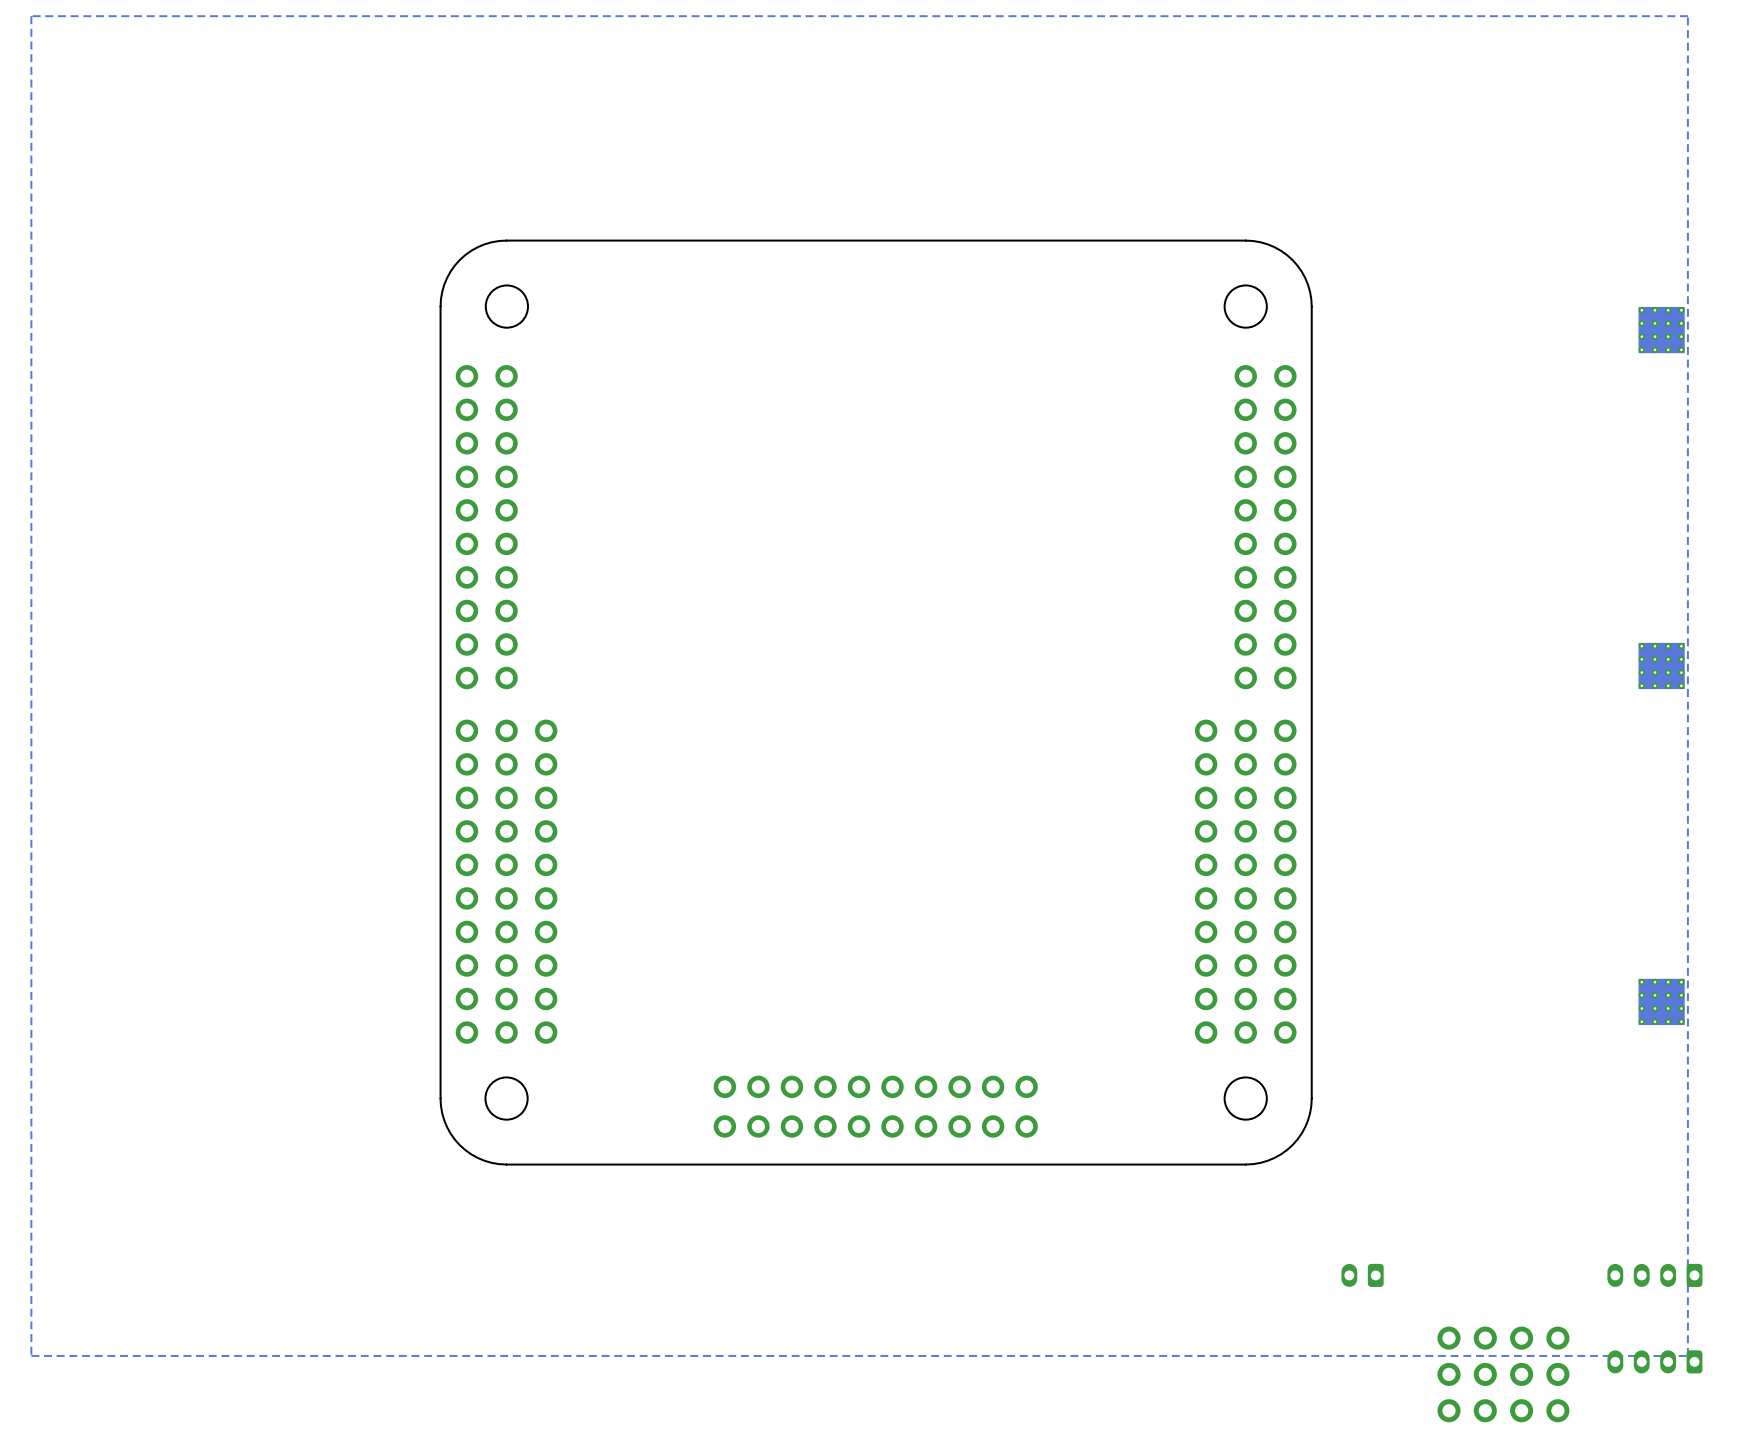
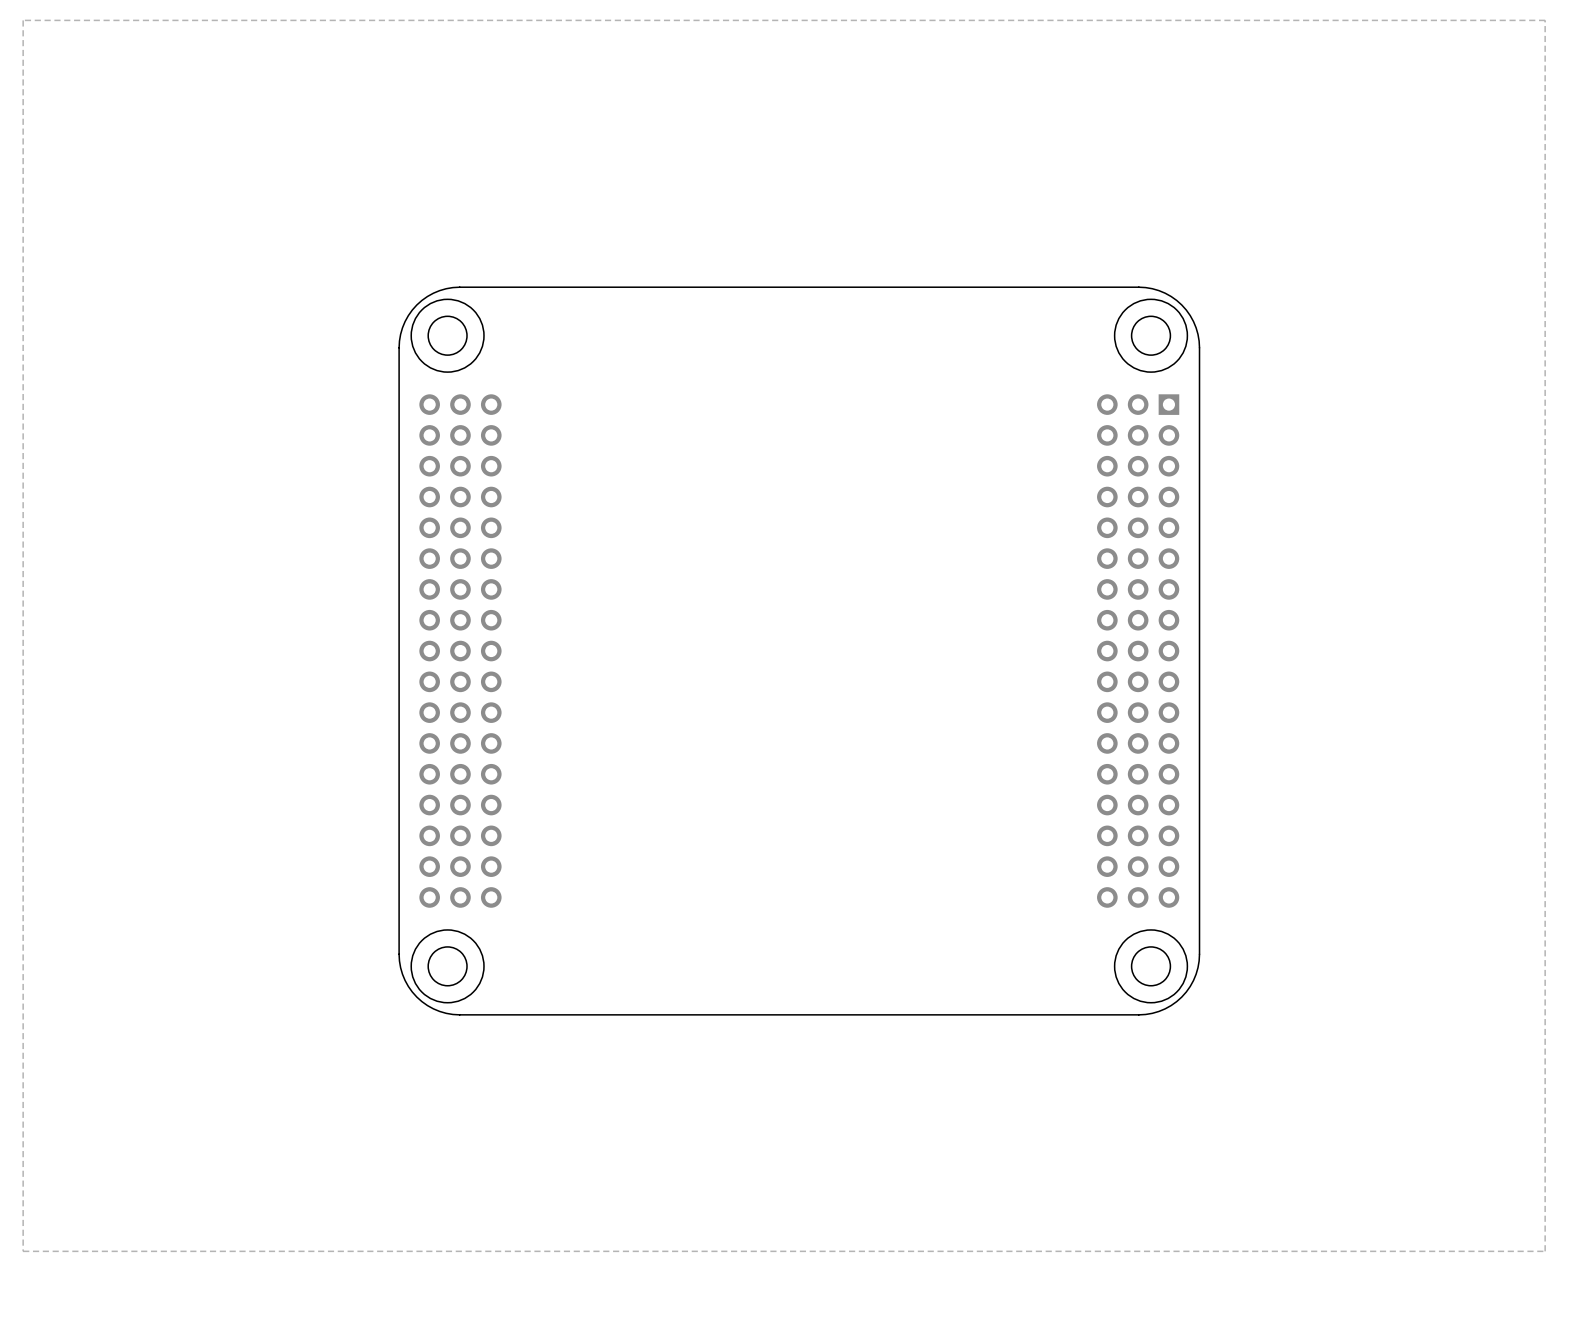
part footprint: [440, 240, 1313, 1165] -> [398, 286, 1200, 1016]
part: (1661, 330) -> none
part: (1661, 666) -> none
part: (1661, 1001) -> none
part: (1362, 1275) -> none
part: (1654, 1275) -> none
part: (1449, 1338) -> none
part: (1485, 1338) -> none
part: (1521, 1338) -> none
part: (1557, 1338) -> none
part: (1654, 1361) -> none
part: (1449, 1374) -> none
part: (1485, 1374) -> none
part: (1521, 1374) -> none
part: (1557, 1374) -> none
part: (1449, 1410) -> none
part: (1485, 1410) -> none
part: (1521, 1410) -> none
part: (1557, 1410) -> none

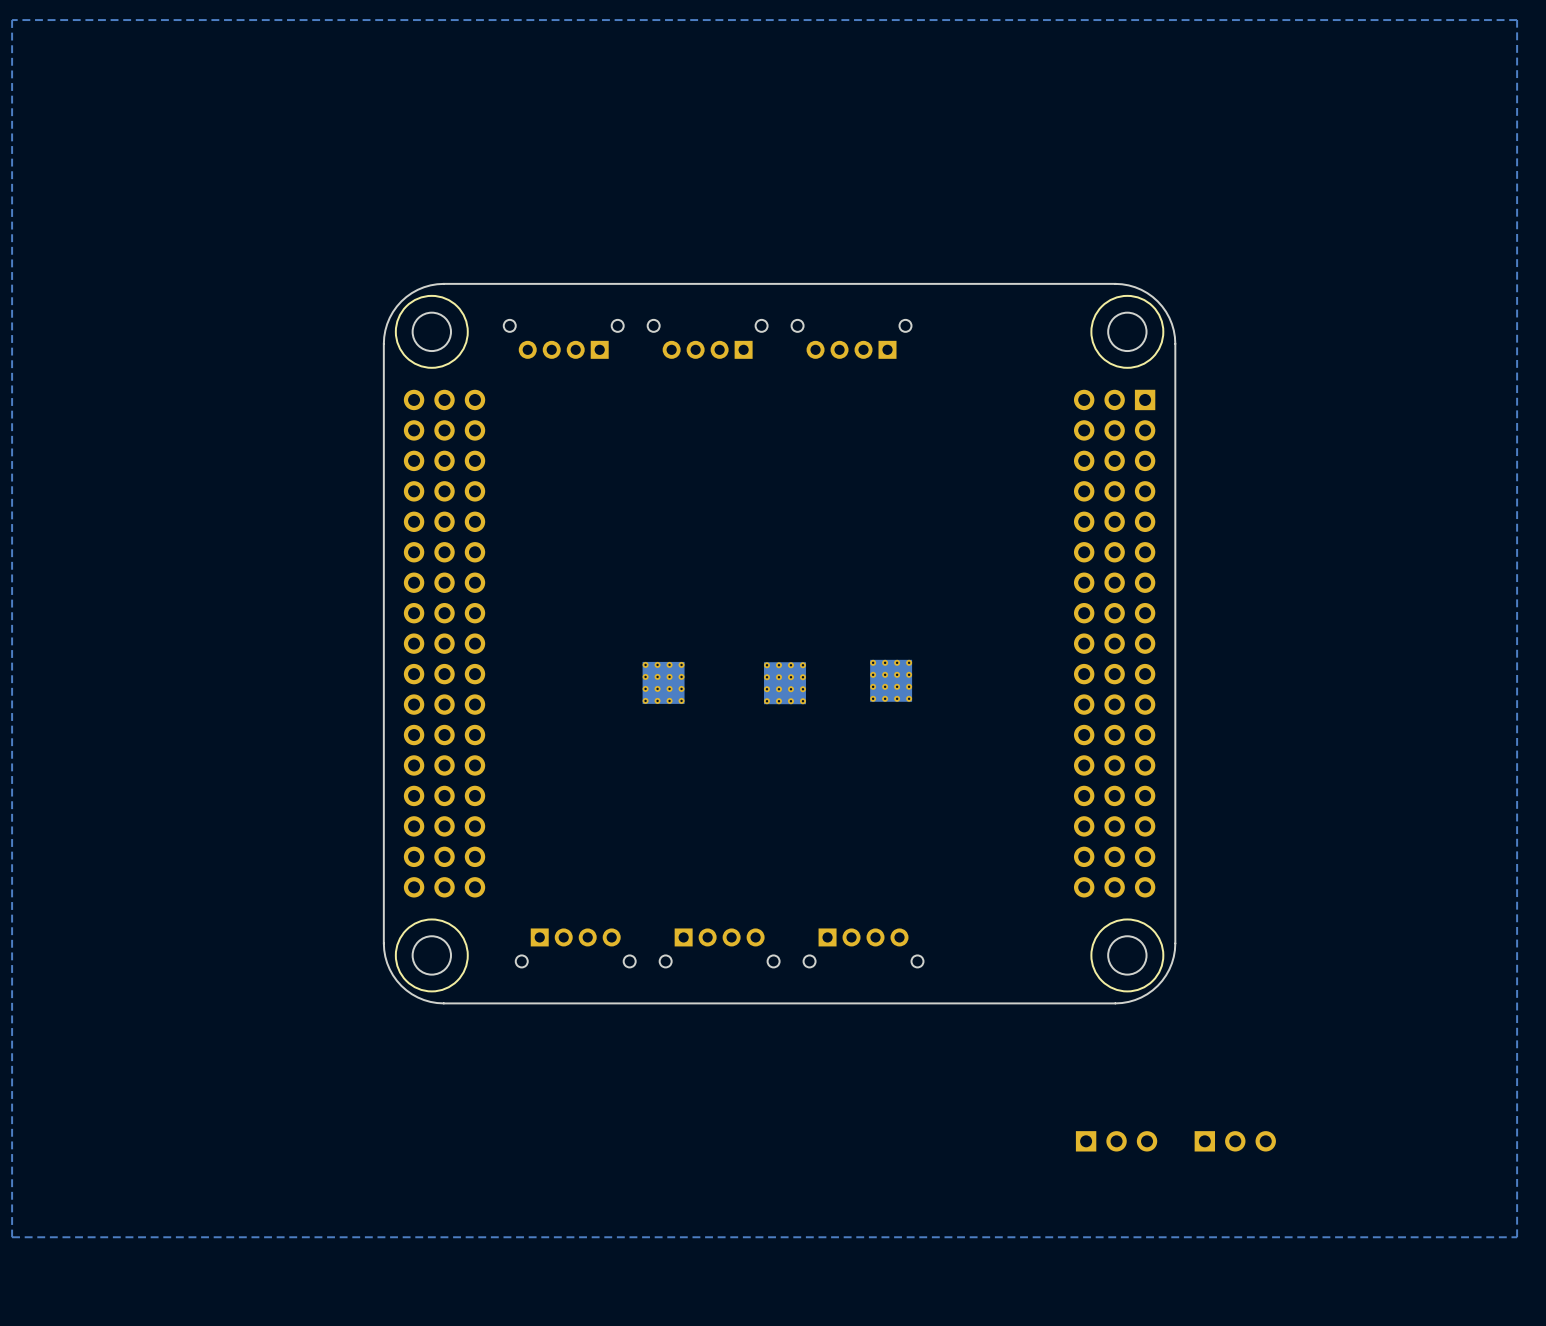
part: none -> (563, 339)
part: none -> (707, 339)
part: none -> (851, 339)
part: none -> (891, 680)
part: none -> (663, 682)
part: none -> (784, 683)
part: none -> (575, 948)
part: none -> (719, 948)
part: none -> (863, 948)
part: none -> (1116, 1141)
part: none -> (1235, 1141)

